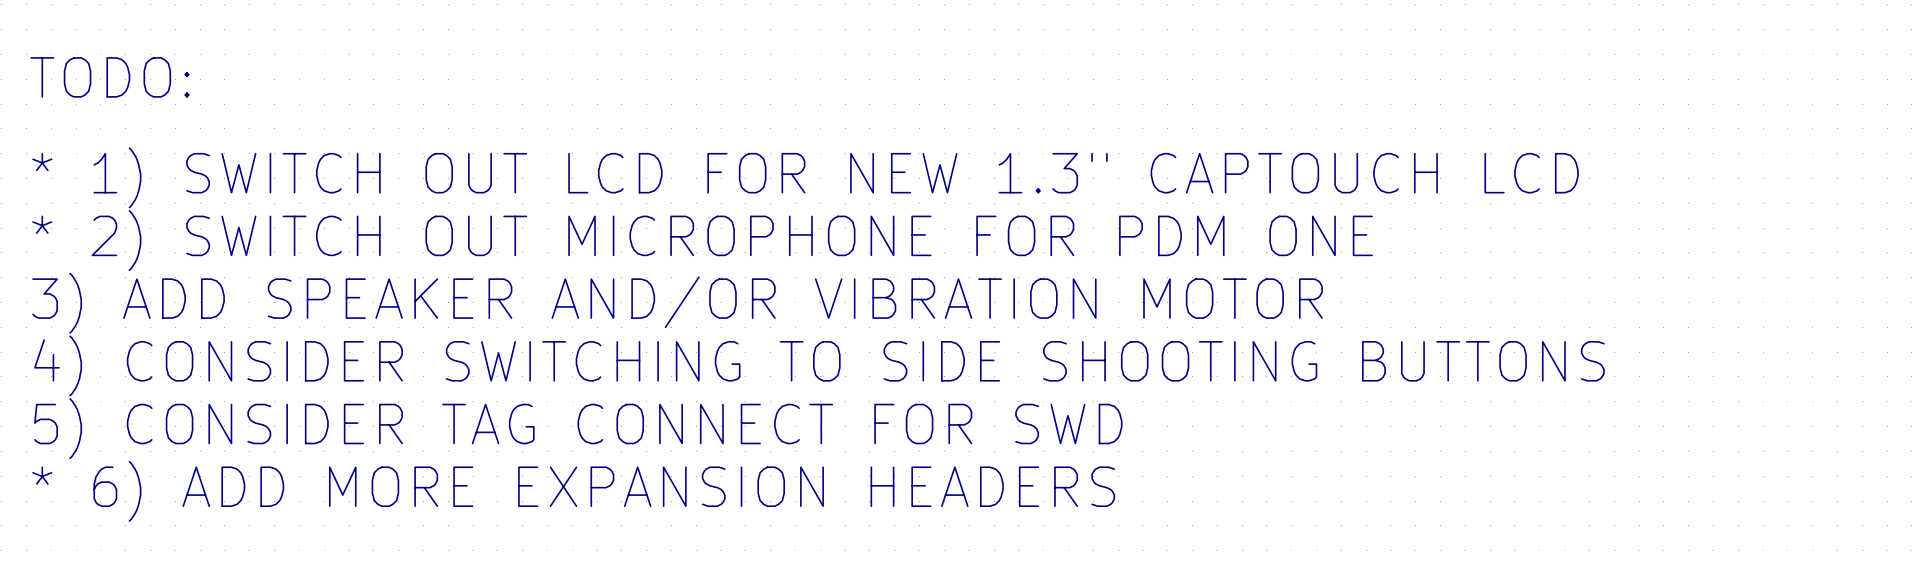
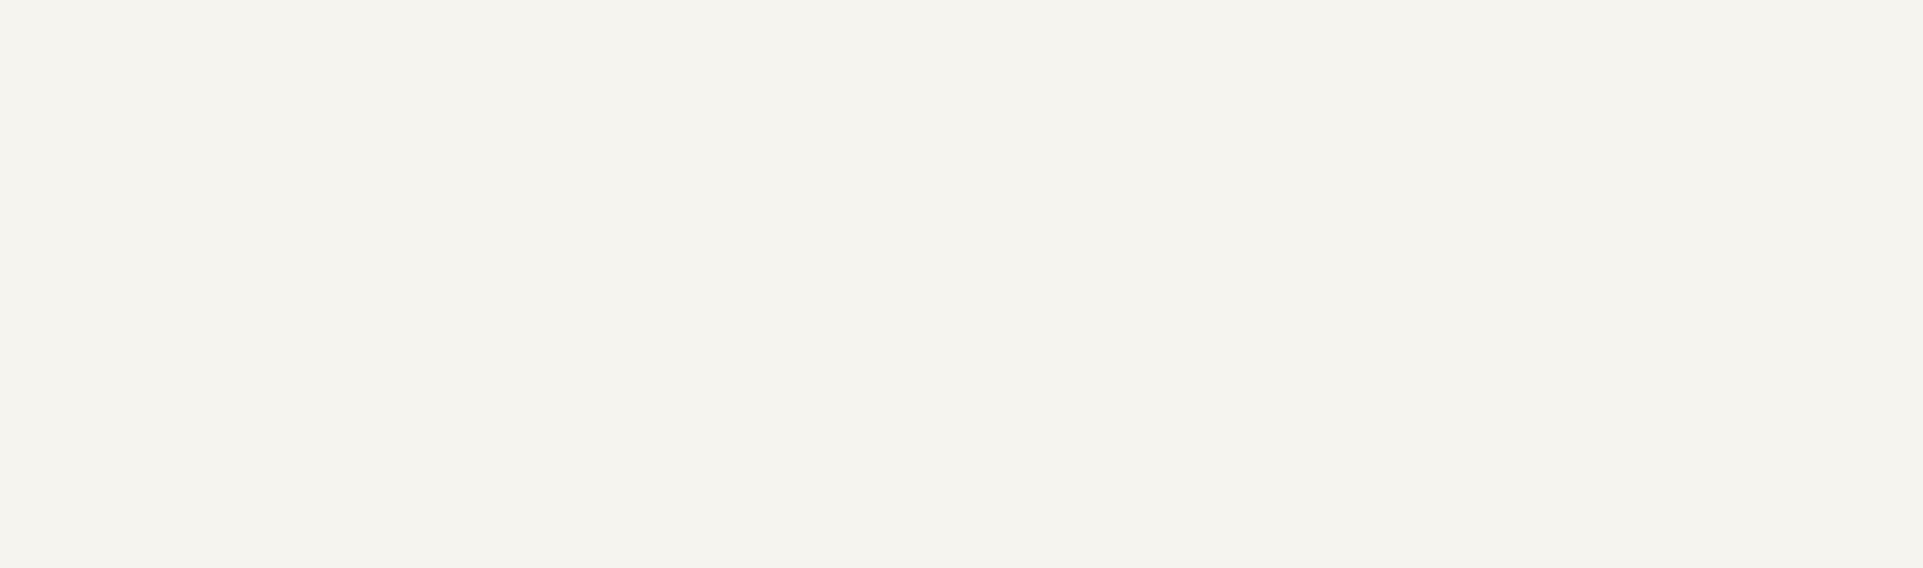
text: TODO: (110, 77) -> none
text: * 1) SWITCH OUT LCD FOR NEW 1.3" CAPTOUCH LCD (805, 177) -> none
text: * 2) SWITCH OUT MICROPHONE FOR PDM ONE (702, 240) -> none
text: 3) ADD SPEAKER AND/OR VIBRATION MOTOR (677, 303) -> none
text: 4) CONSIDER SWITCHING TO SIDE SHOOTING BUTTONS (819, 365) -> none
text: 5) CONSIDER TAG CONNECT FOR SWD (578, 428) -> none
text: * 6) ADD MORE EXPANSION HEADERS (573, 491) -> none

